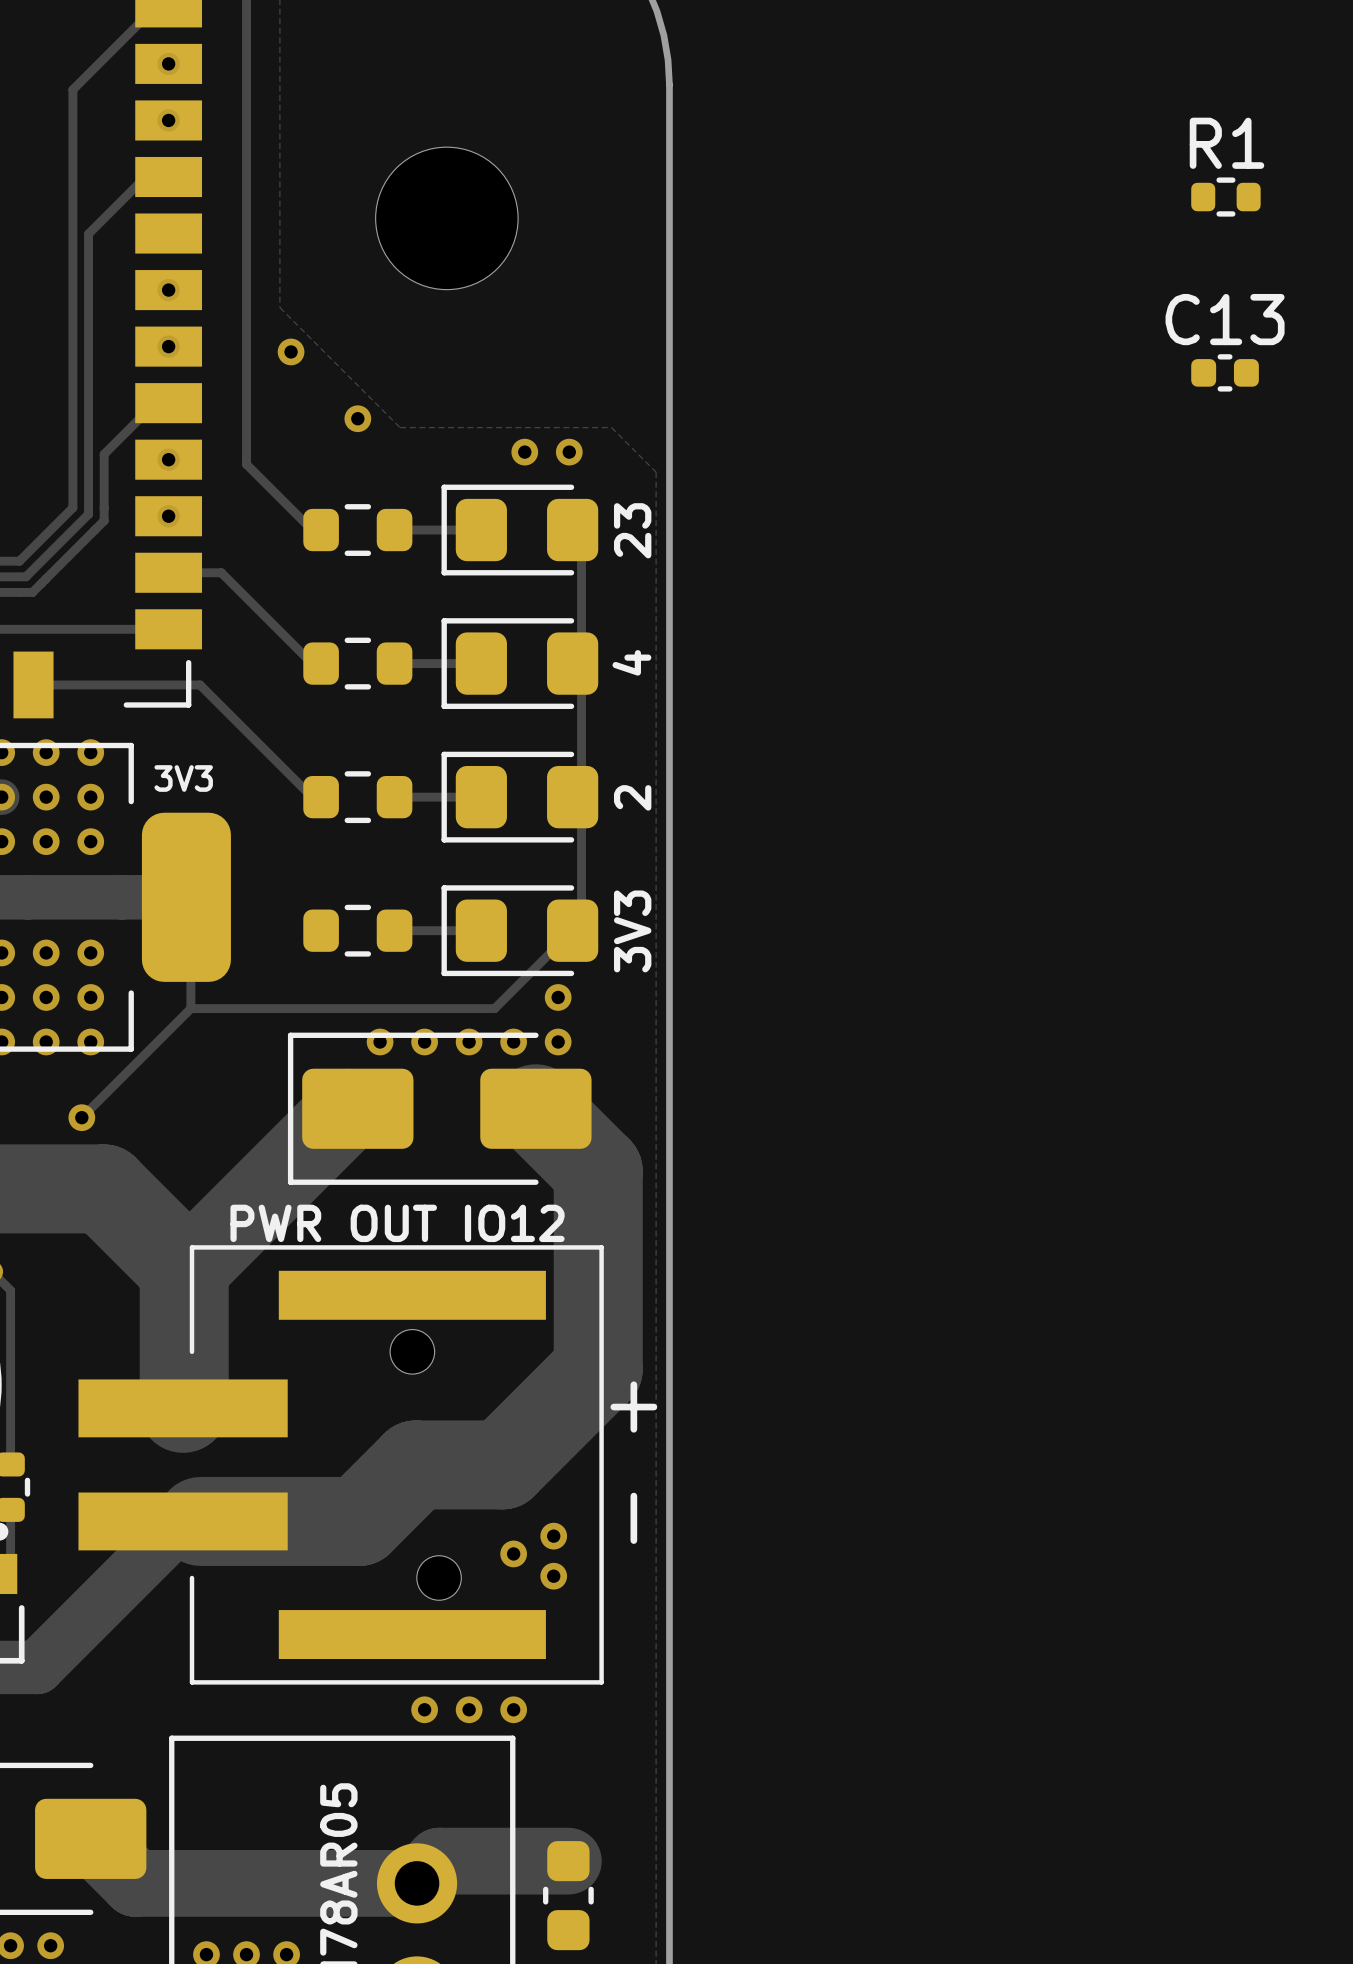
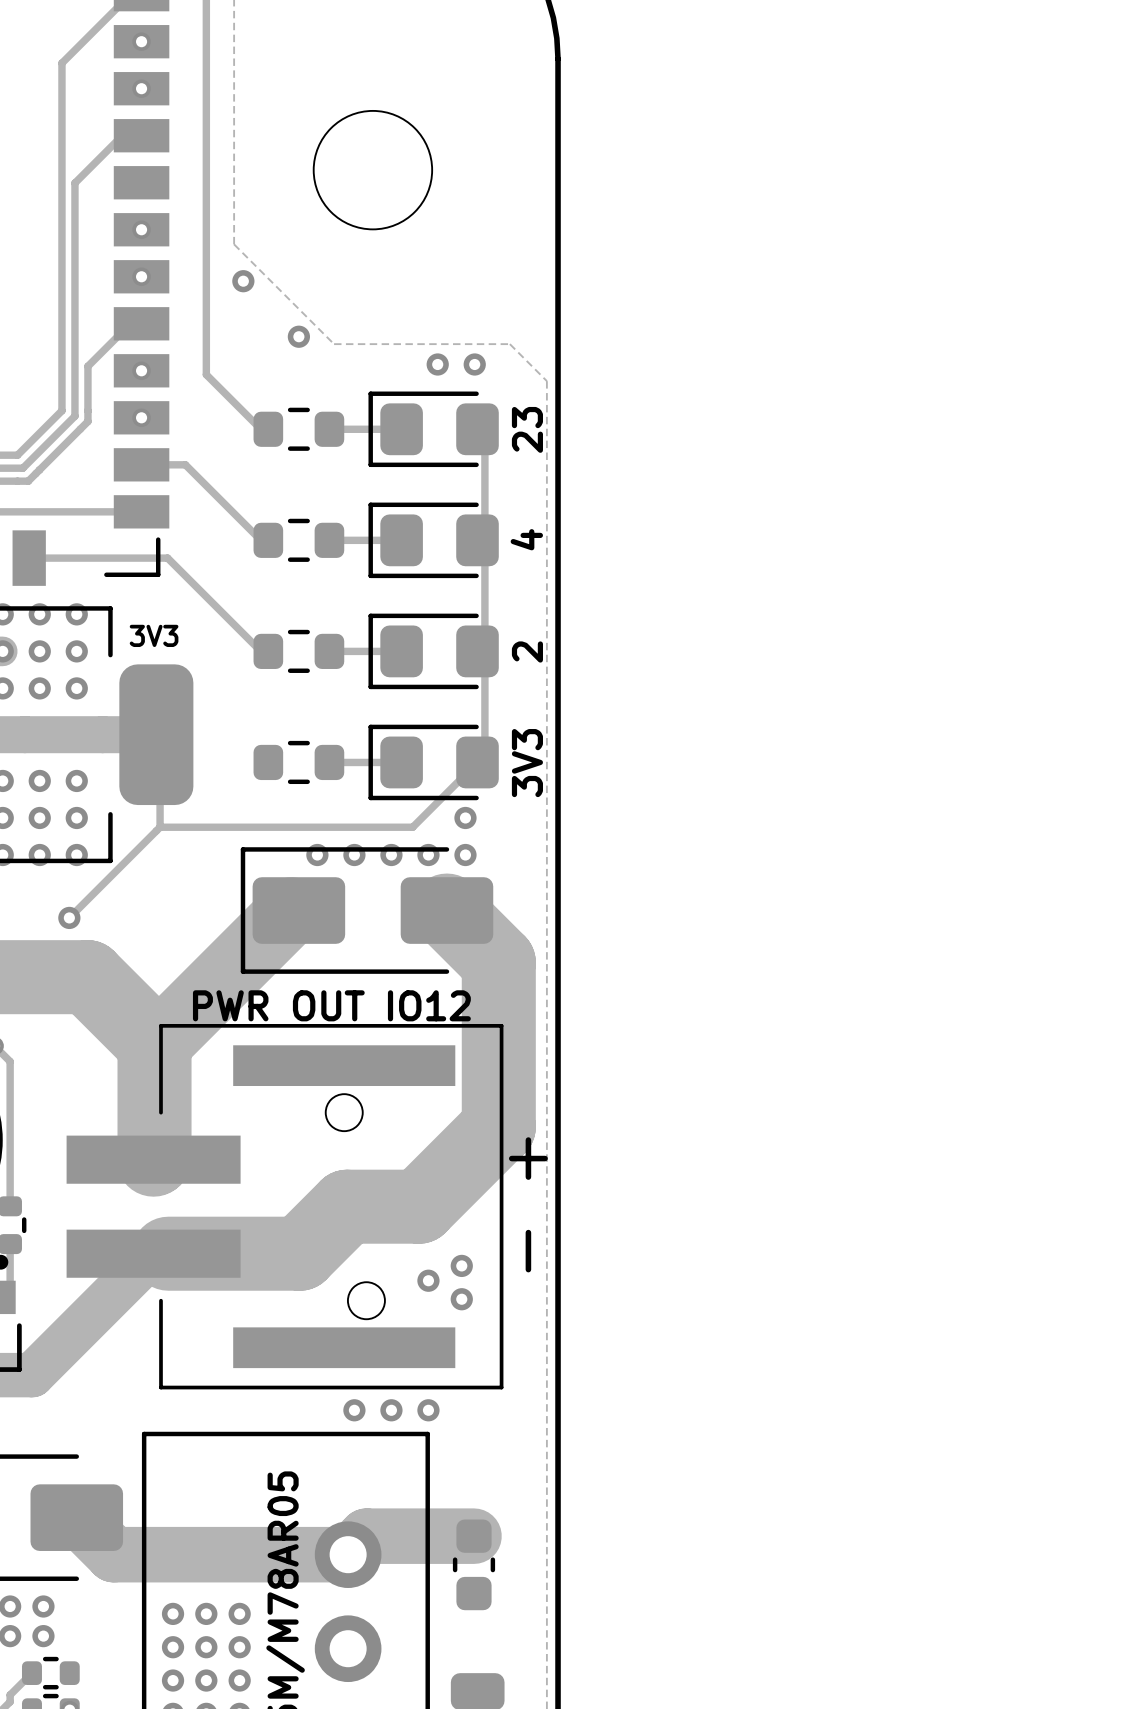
R1: (1225, 197) -> none
C13: (1225, 372) -> none

